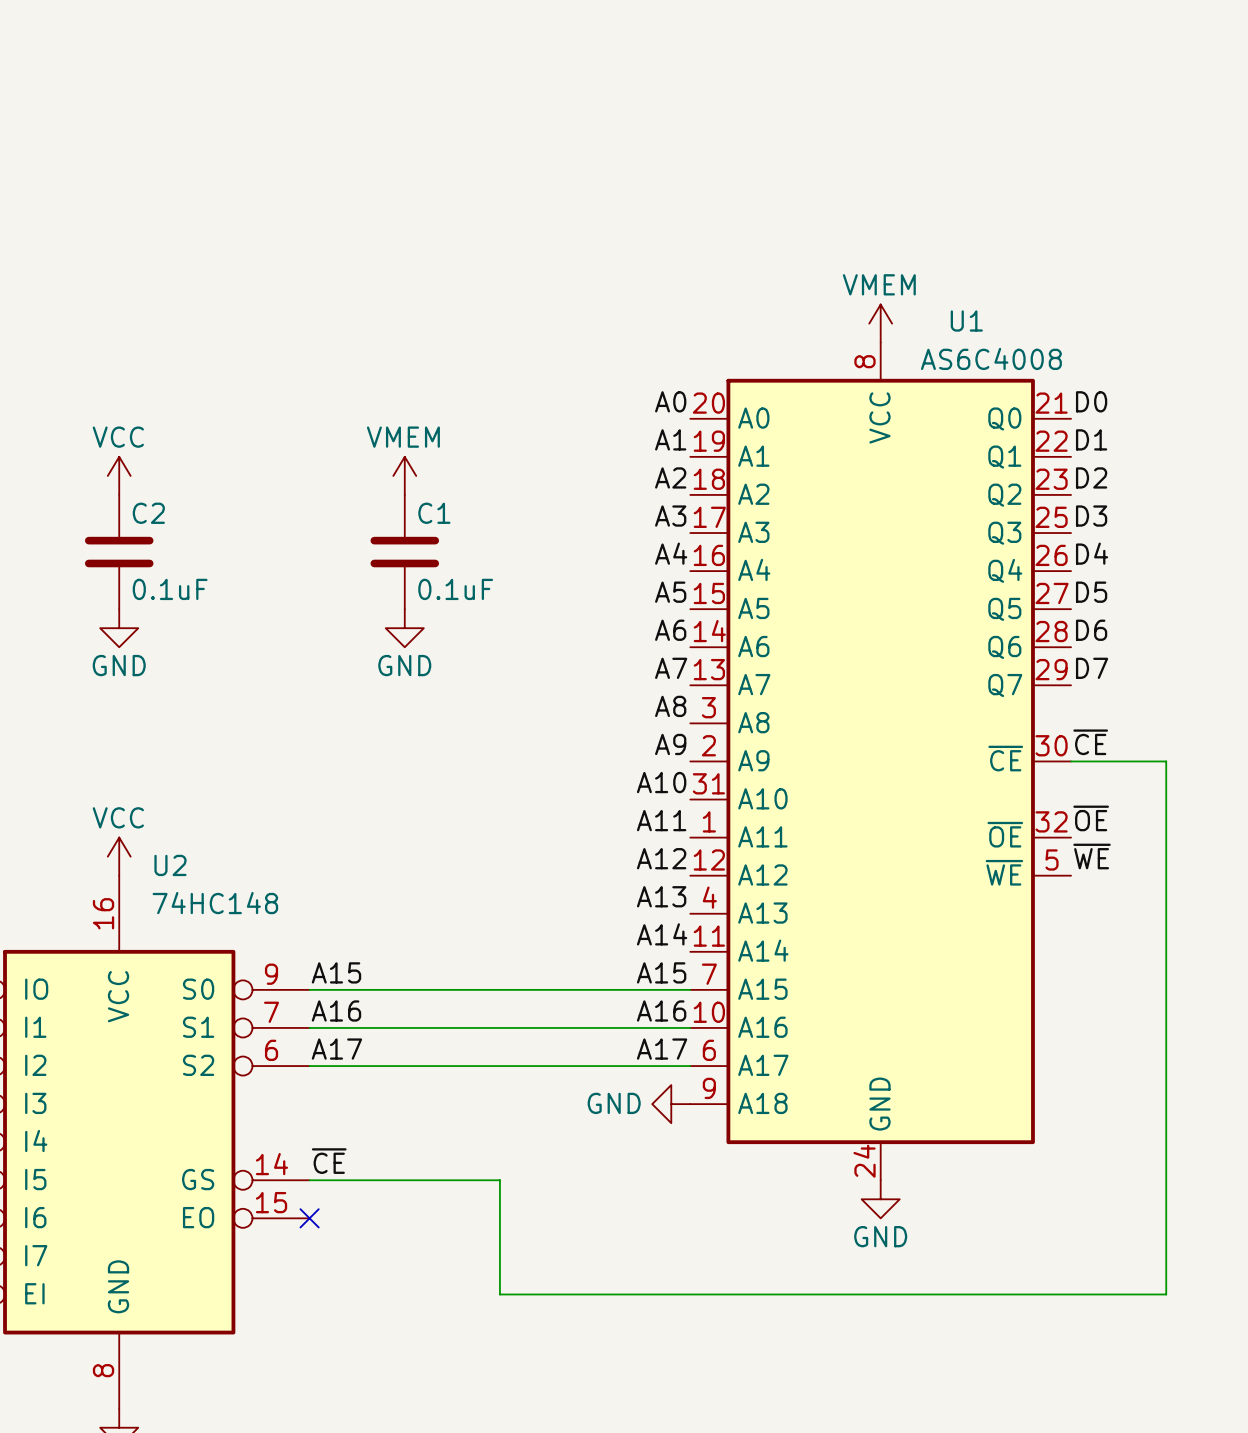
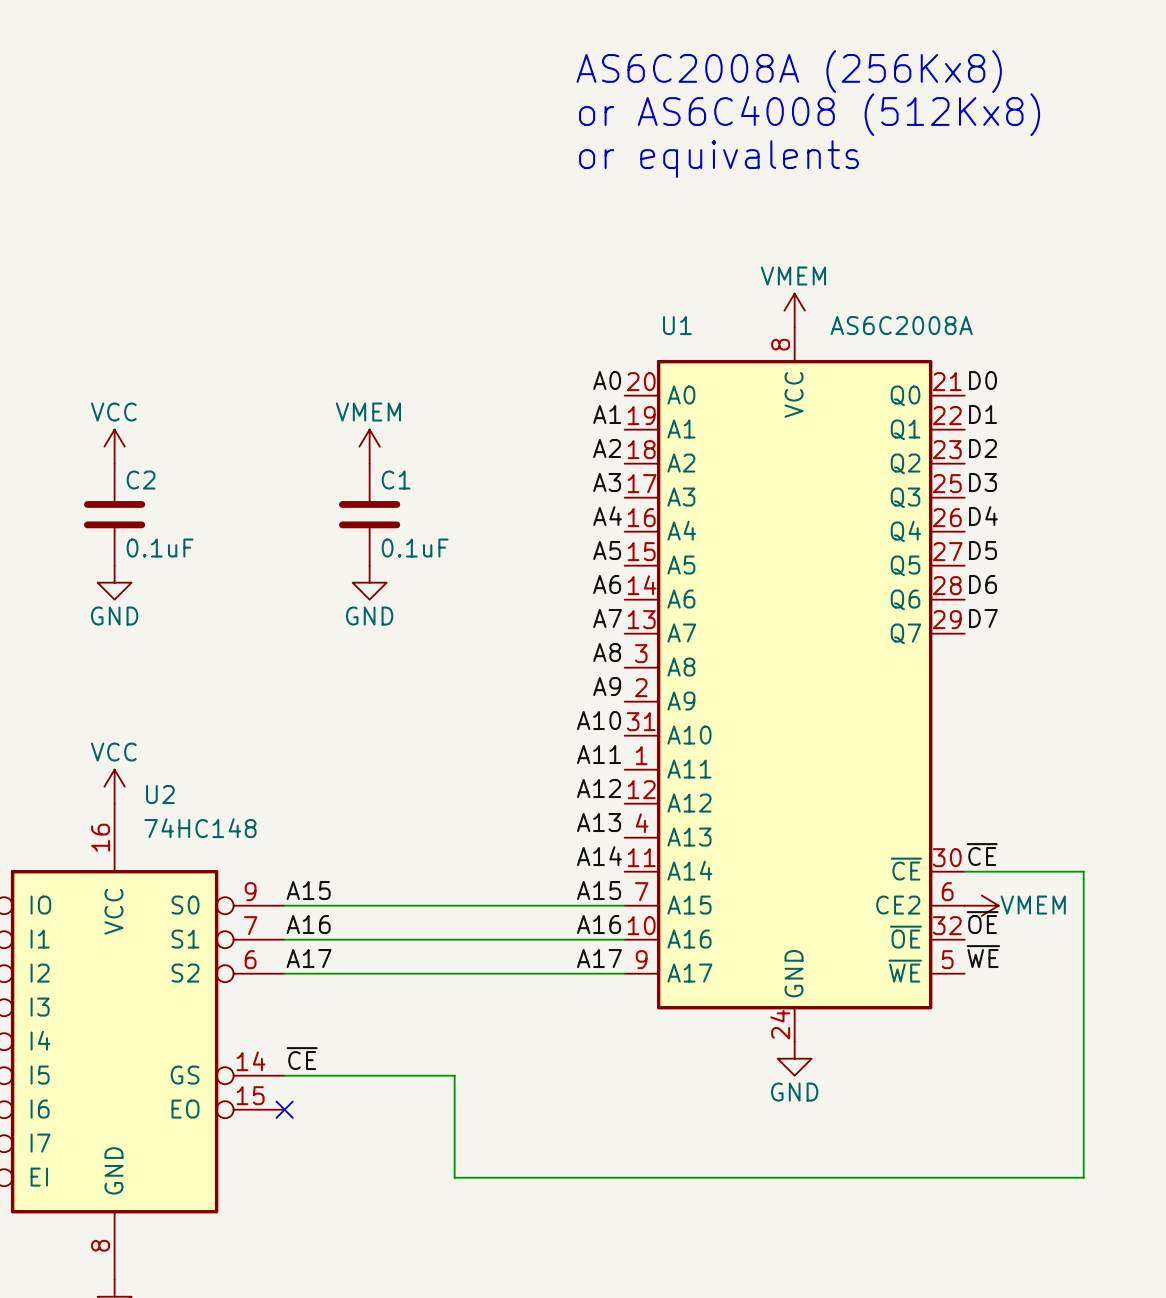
text: none -> AS6C2008A (256Kx8) (789, 71)
text: none -> or AS6C4008 (512Kx8) (809, 114)
text: none -> or equivalents (719, 159)
U1 name position: U1 (966, 321) -> U1 (677, 325)
U1 symbol: [690, 342, 1072, 1181] -> [624, 327, 965, 1042]
U1 value: AS6C4008 (991, 358) -> AS6C2008A (901, 325)
label position: ~{CE} (1090, 742) -> ~{CE} (982, 854)
wire: (1071, 761) (1166, 761) (1166, 1294) -> (964, 871) (1083, 871) (1083, 1177) (1049, 1177)
label position: ~{OE} (1091, 818) -> ~{OE} (982, 922)
label position: ~{WE} (1092, 856) -> ~{WE} (983, 956)
power symbol: none -> VMEM (981, 905)
power symbol: GND (671, 1104) -> none
power symbol position: GND (880, 1199) -> GND (794, 1058)

